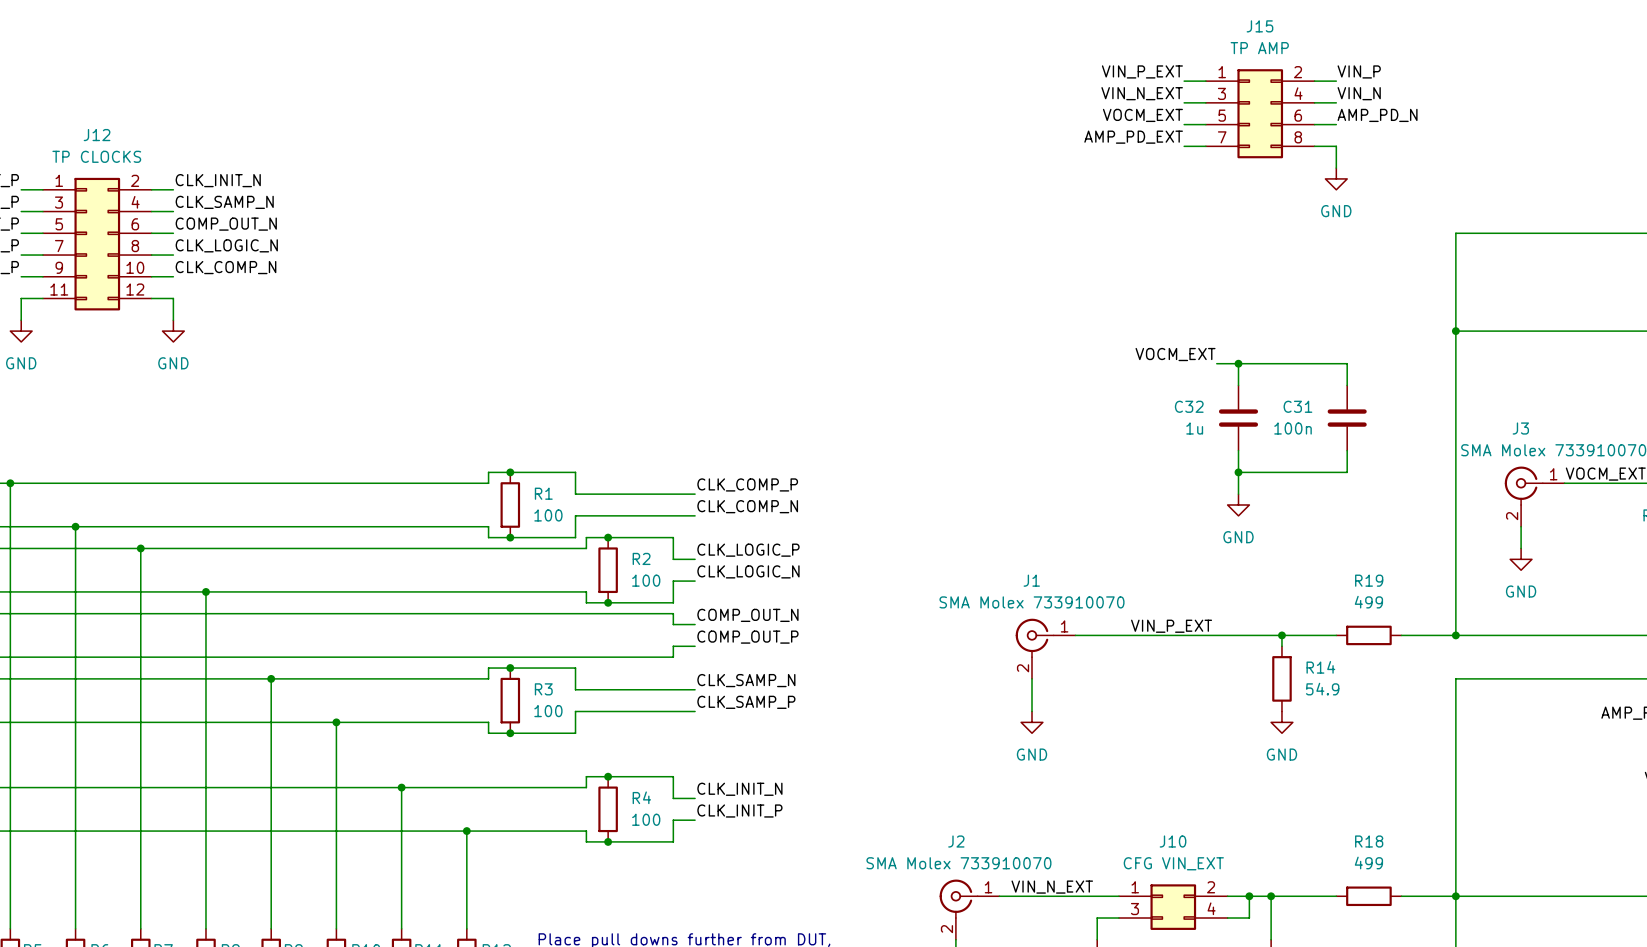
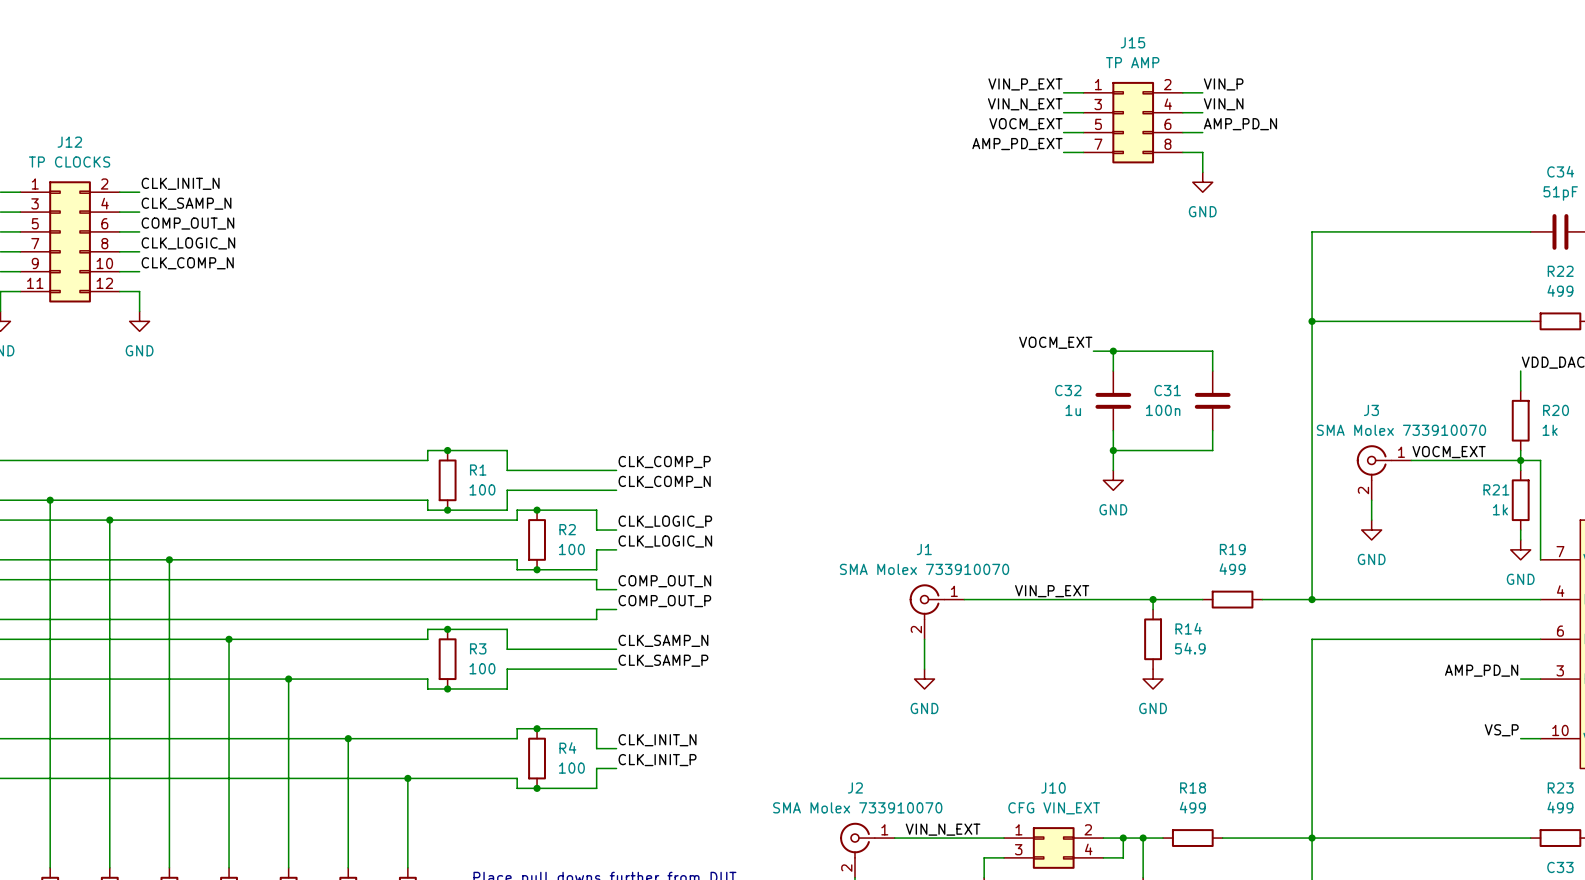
wire: (1292, 896) (1336, 896) -> (1222, 838) (1262, 838)
R18 position: (1368, 896) -> (1192, 838)

